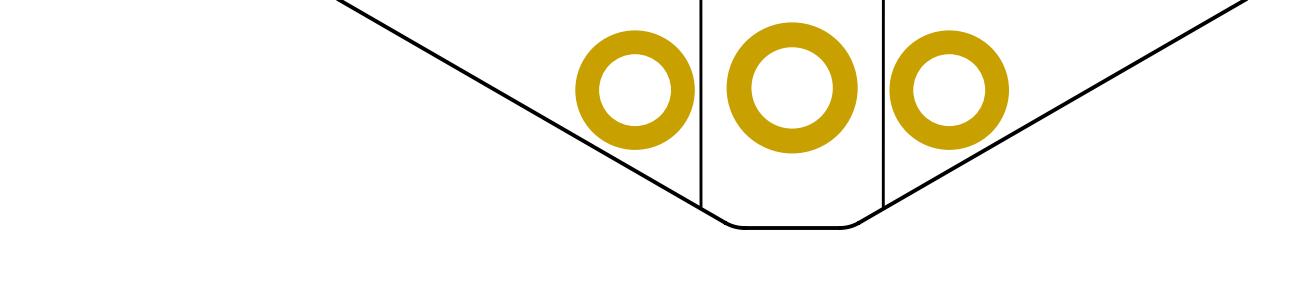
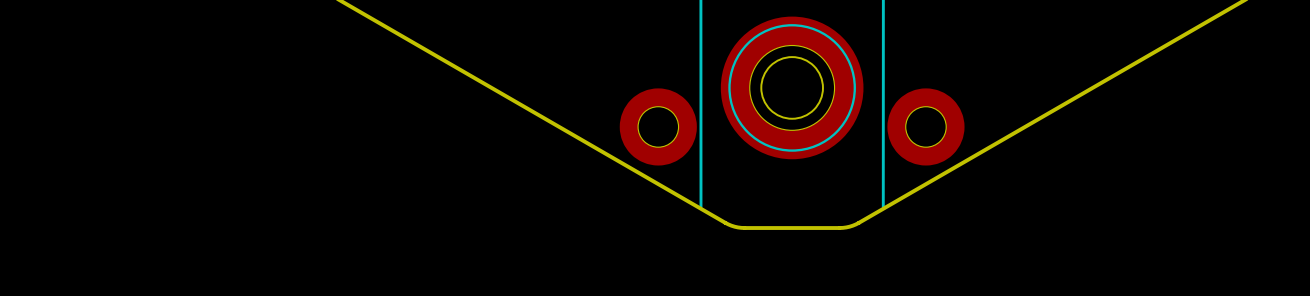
part footprint: [726, 22, 858, 154] -> [720, 16, 864, 160]
drawing: none -> [728, 24, 856, 152]
round board edge: none -> [760, 56, 824, 120]
part: (635, 90) -> none
part: (949, 90) -> none
part: none -> (658, 126)
part: none -> (925, 126)

